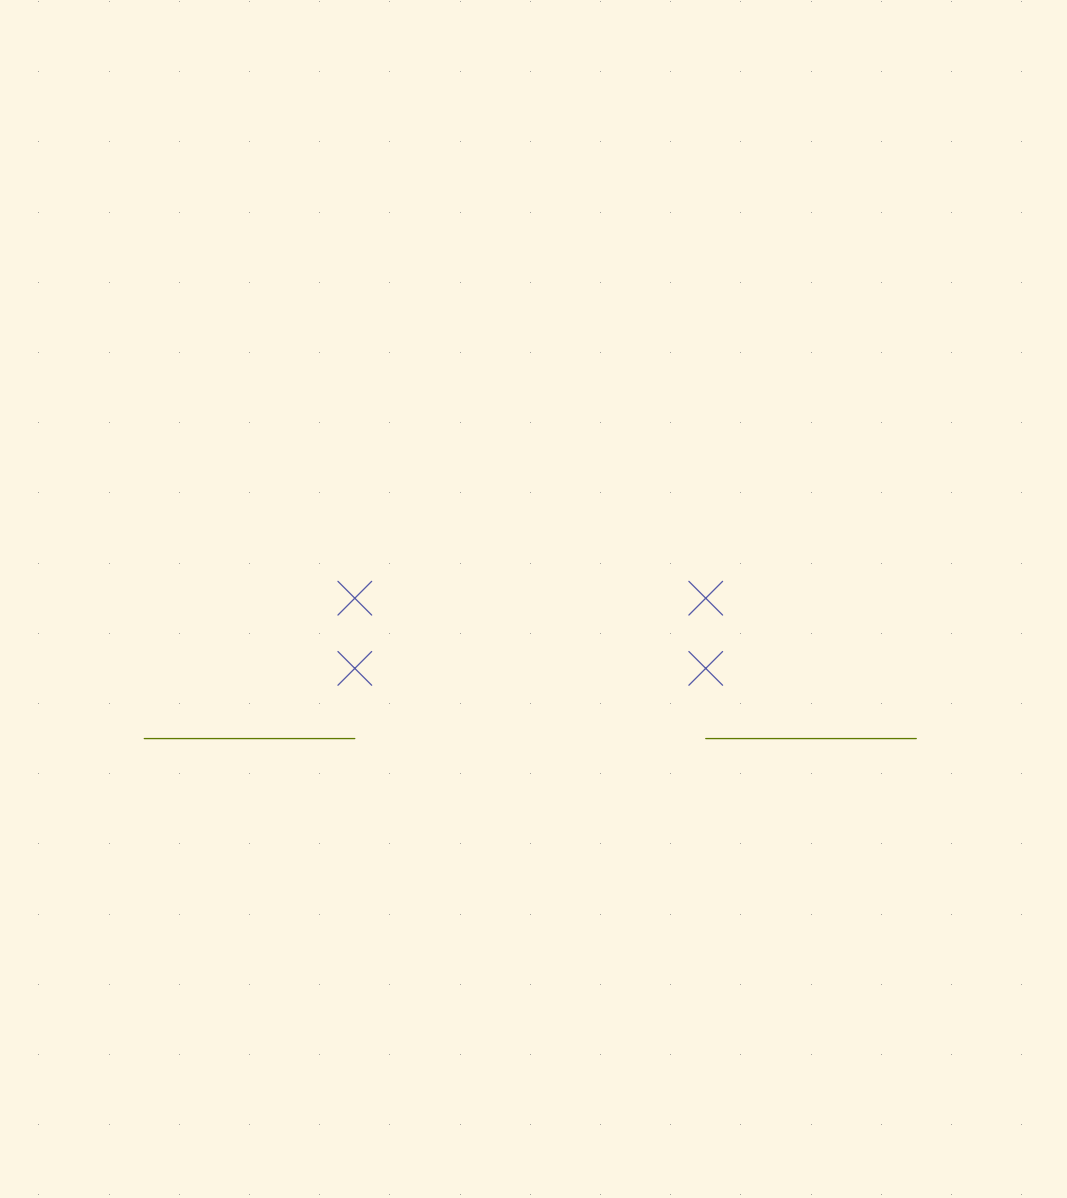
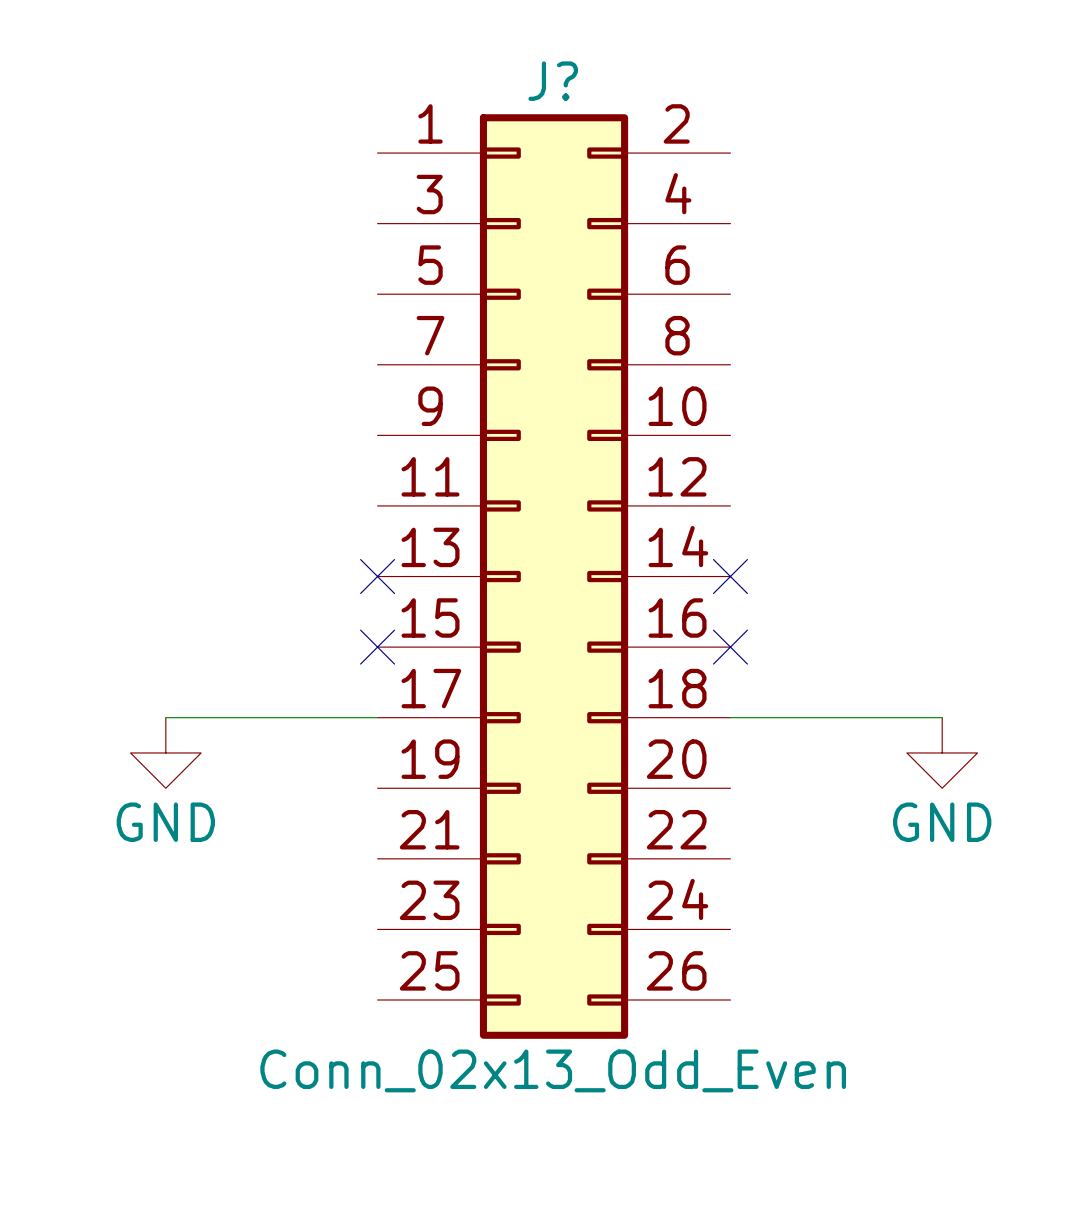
J?: none -> Conn_02x13_Odd_Even (554, 576)
power symbol: none -> GND (165, 752)
power symbol: none -> GND (942, 752)

